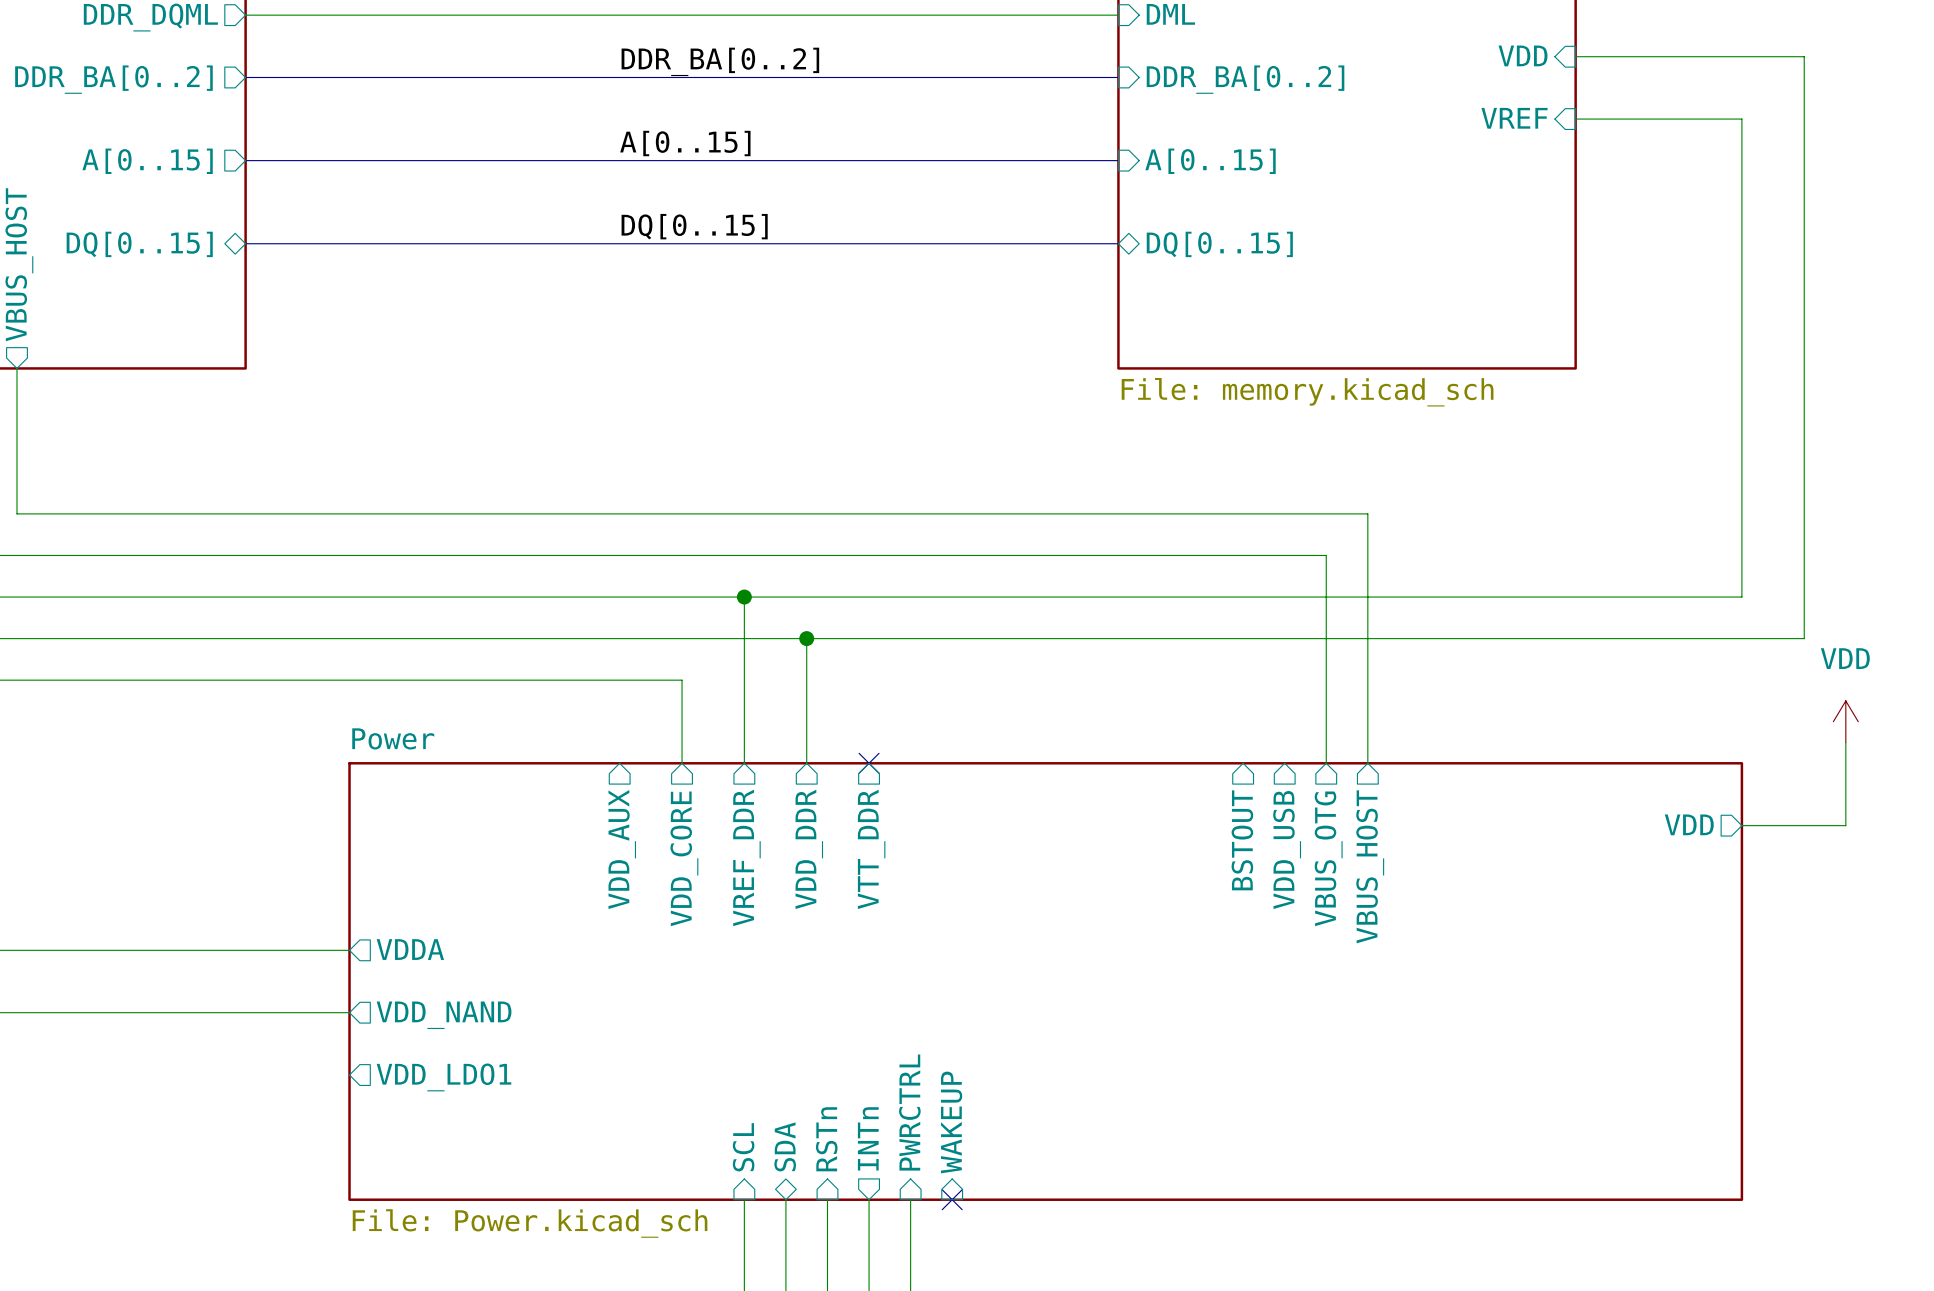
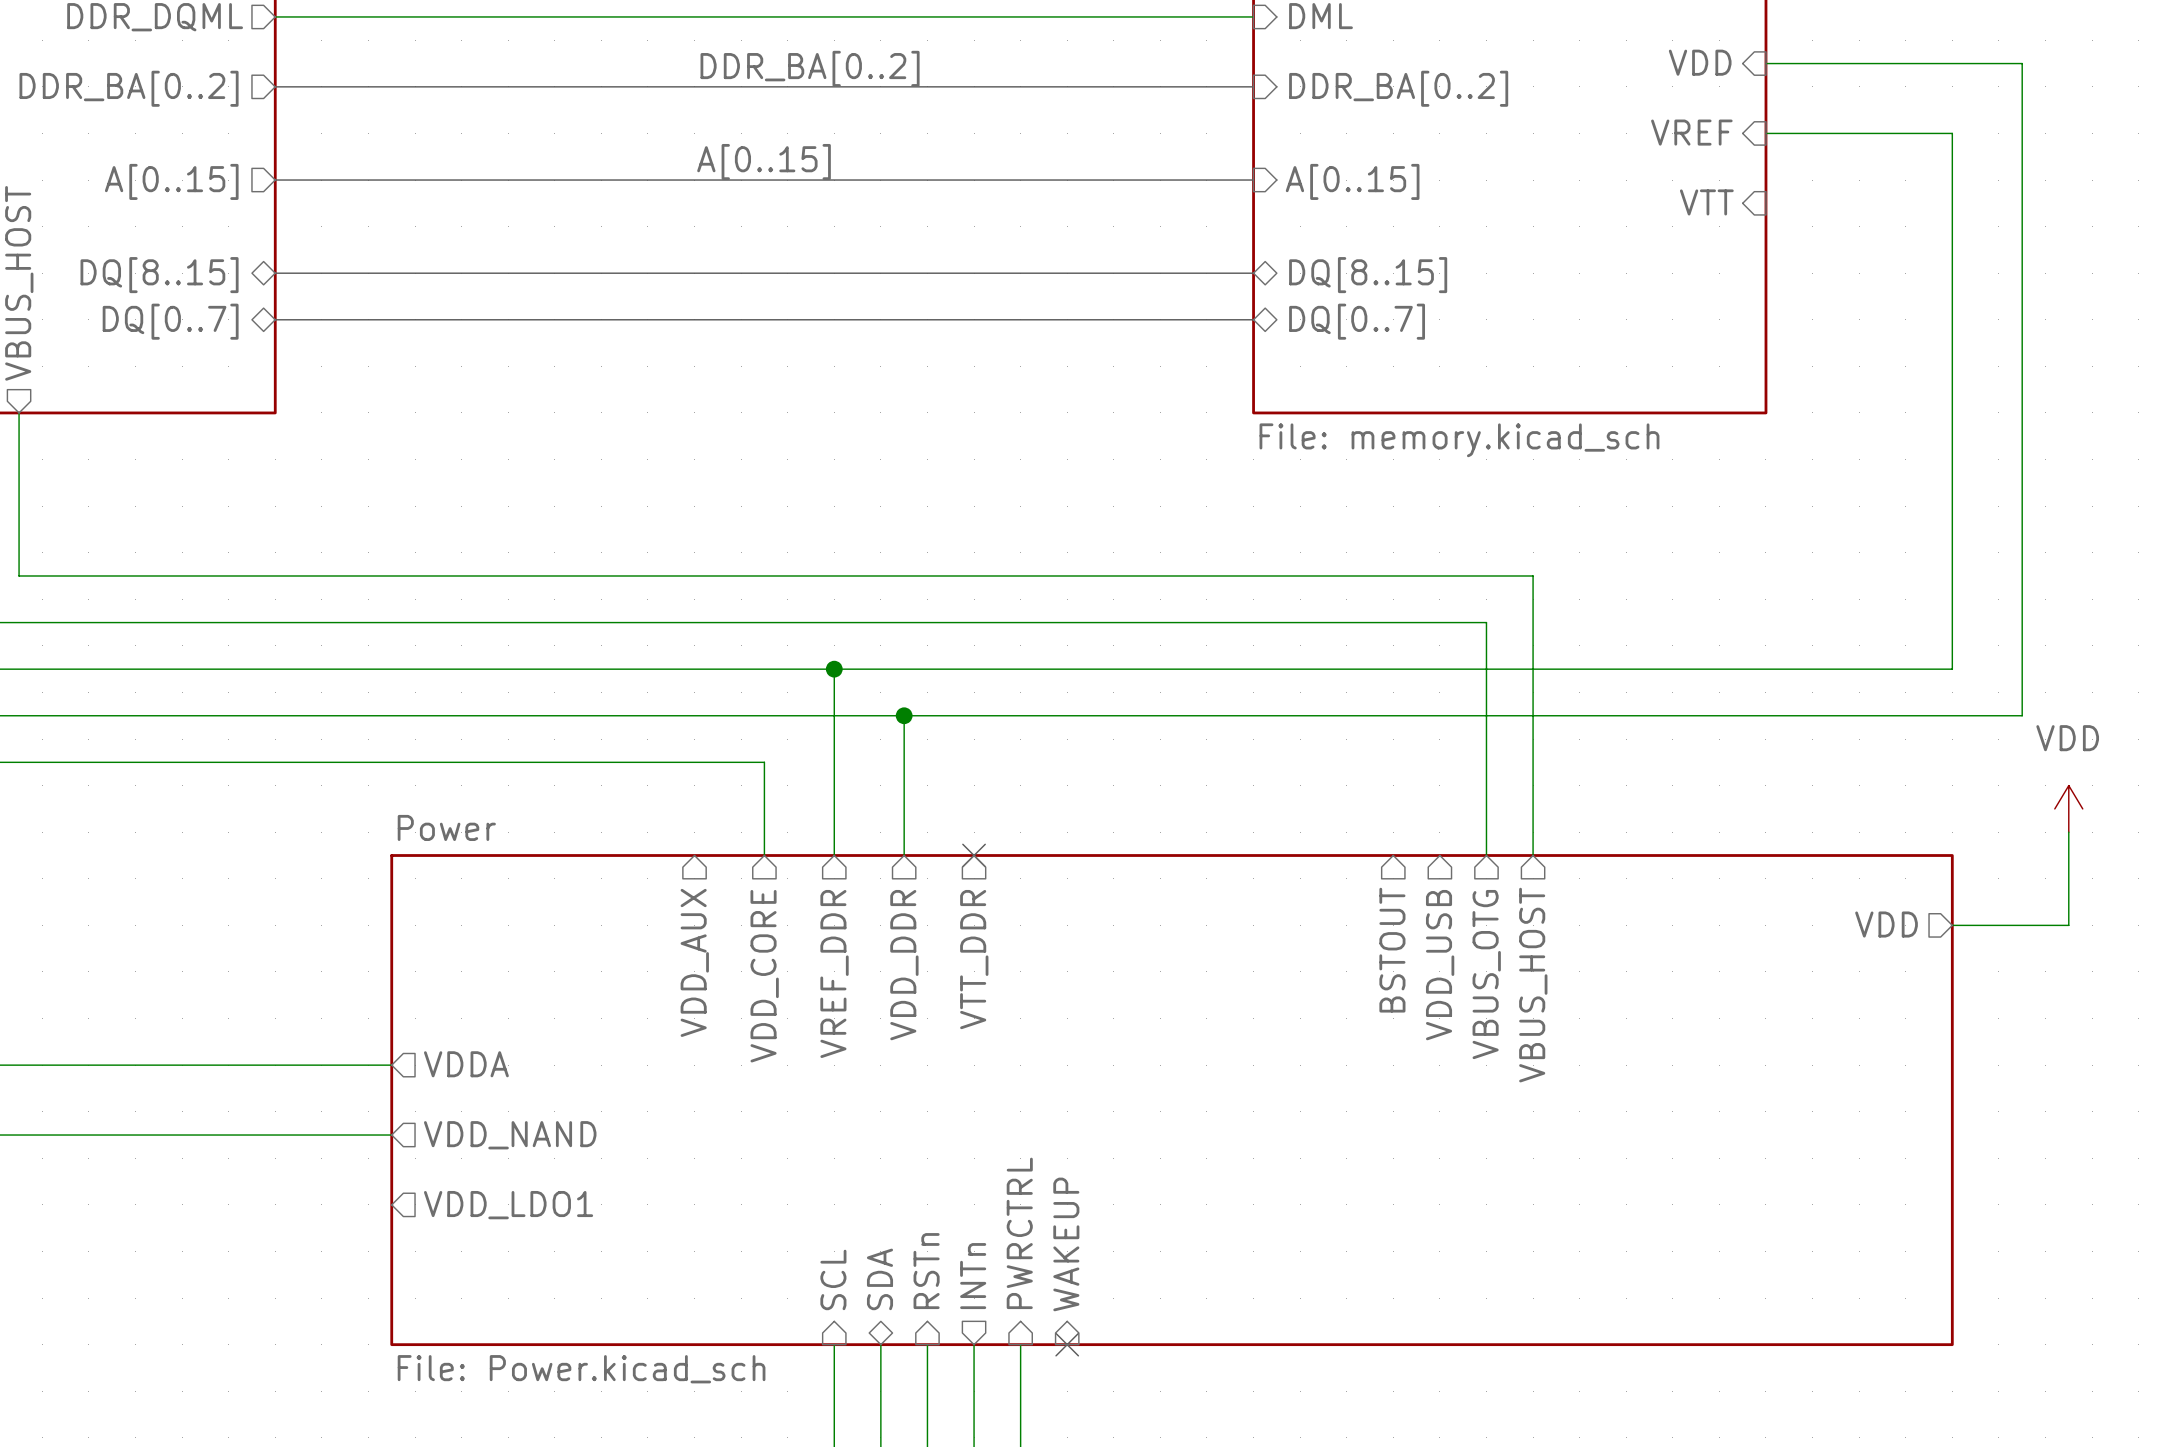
sheet pin: none -> VTT (1706, 202)
label: DQ[0..15] (694, 226) -> none
sheet pin: DQ[0..15] (139, 244) -> DQ[8..15] (159, 275)
sheet pin: DQ[0..15] (1219, 244) -> DQ[8..15] (1368, 275)
sheet pin: none -> DQ[0..7] (170, 321)
bus: none -> (275, 319) (1253, 319)
sheet pin: none -> DQ[0..7] (1357, 321)

